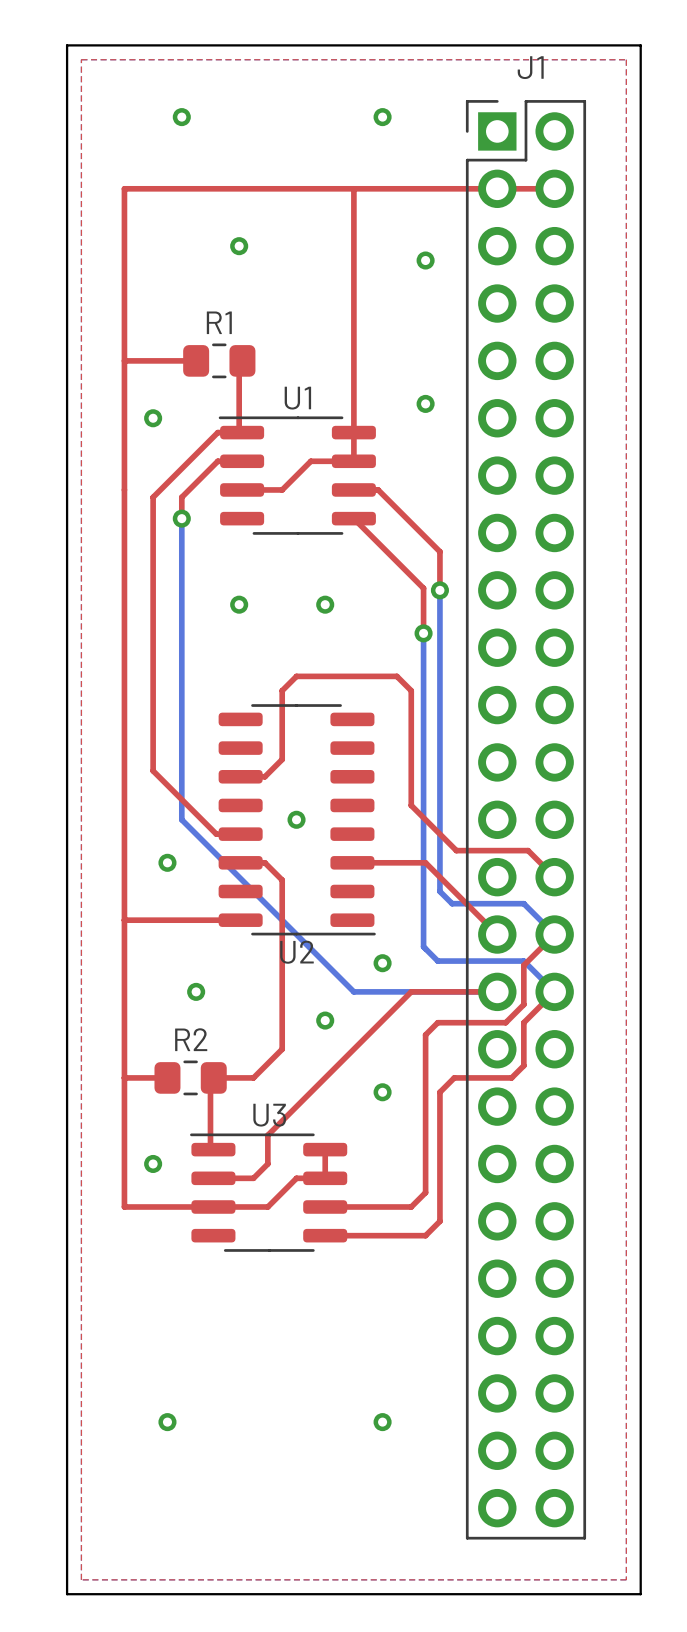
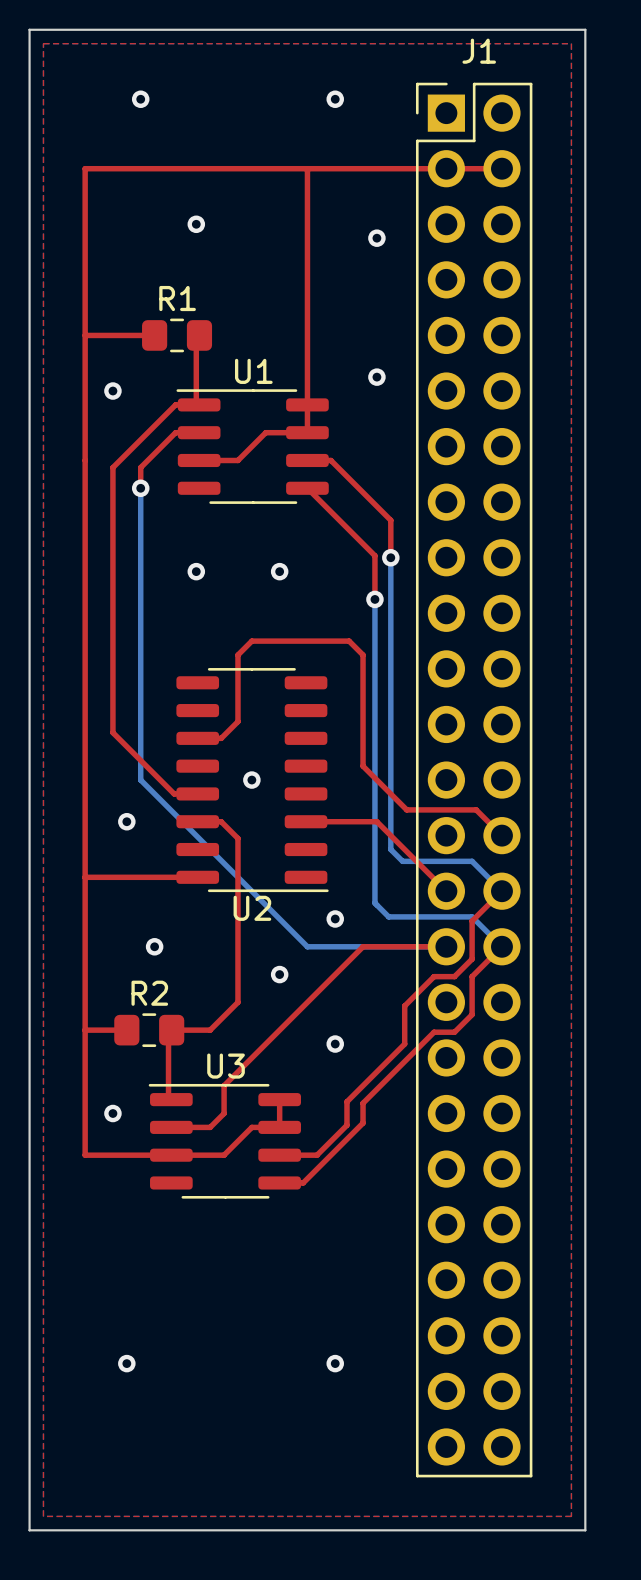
top track: (484, 1022) (437, 1022) (425, 1034) (425, 1192) (411, 1206) (363, 1206) -> (434, 976) (404, 1005) (404, 1044) (346, 1101) (346, 1125) (317, 1155)
top track: (523, 1061) (523, 1065) (511, 1077) (454, 1077) (439, 1092) (439, 1221) (425, 1235) (349, 1235) -> (472, 1014) (454, 1032) (434, 1032) (363, 1103) (363, 1123) (303, 1182)

